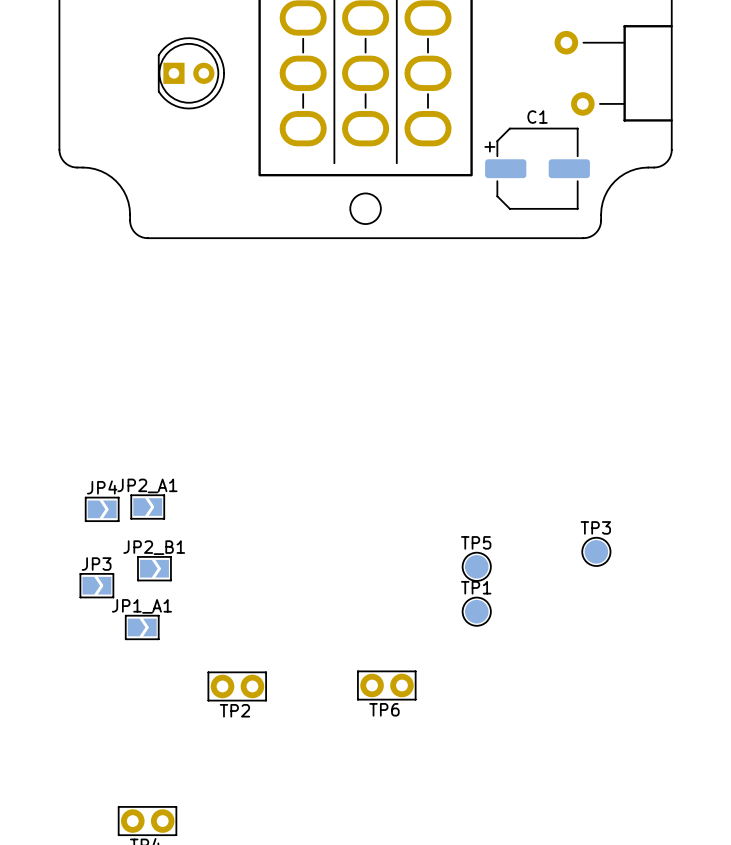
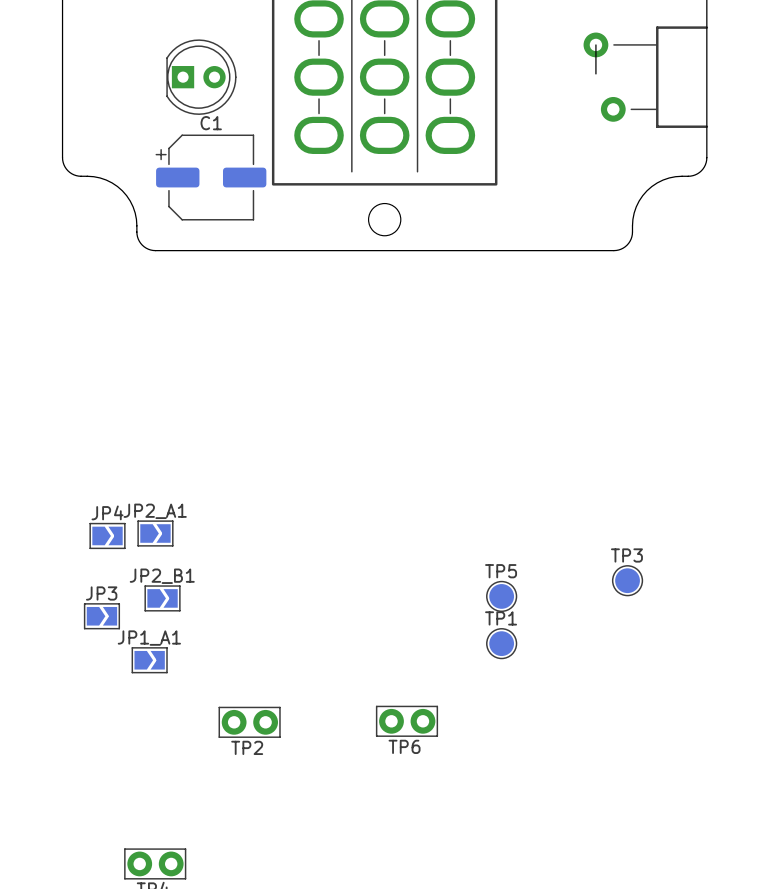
board edge: none -> (595, 44) (595, 73)
C1 position: (537, 168) -> (210, 177)

